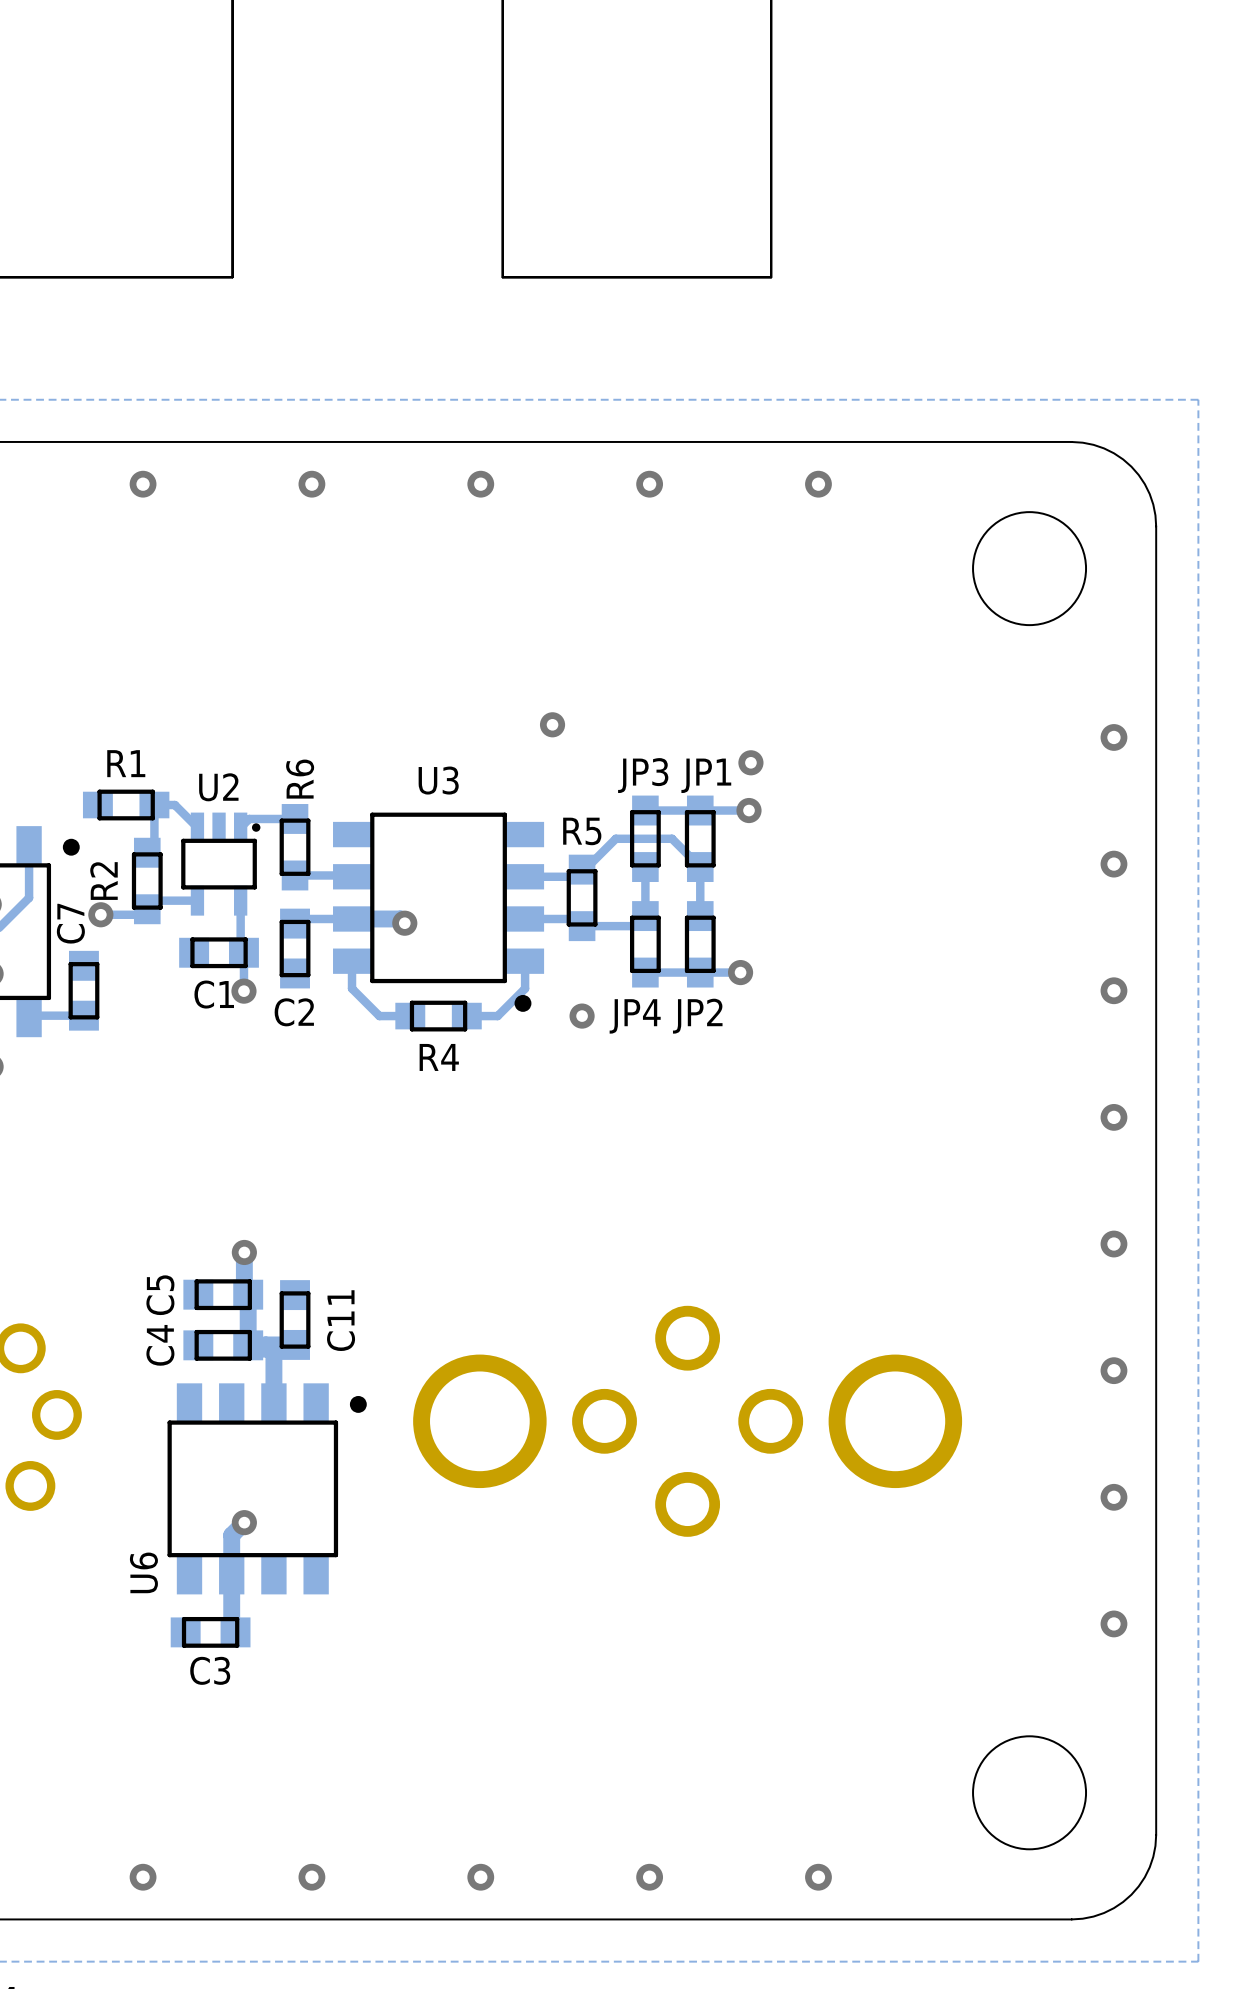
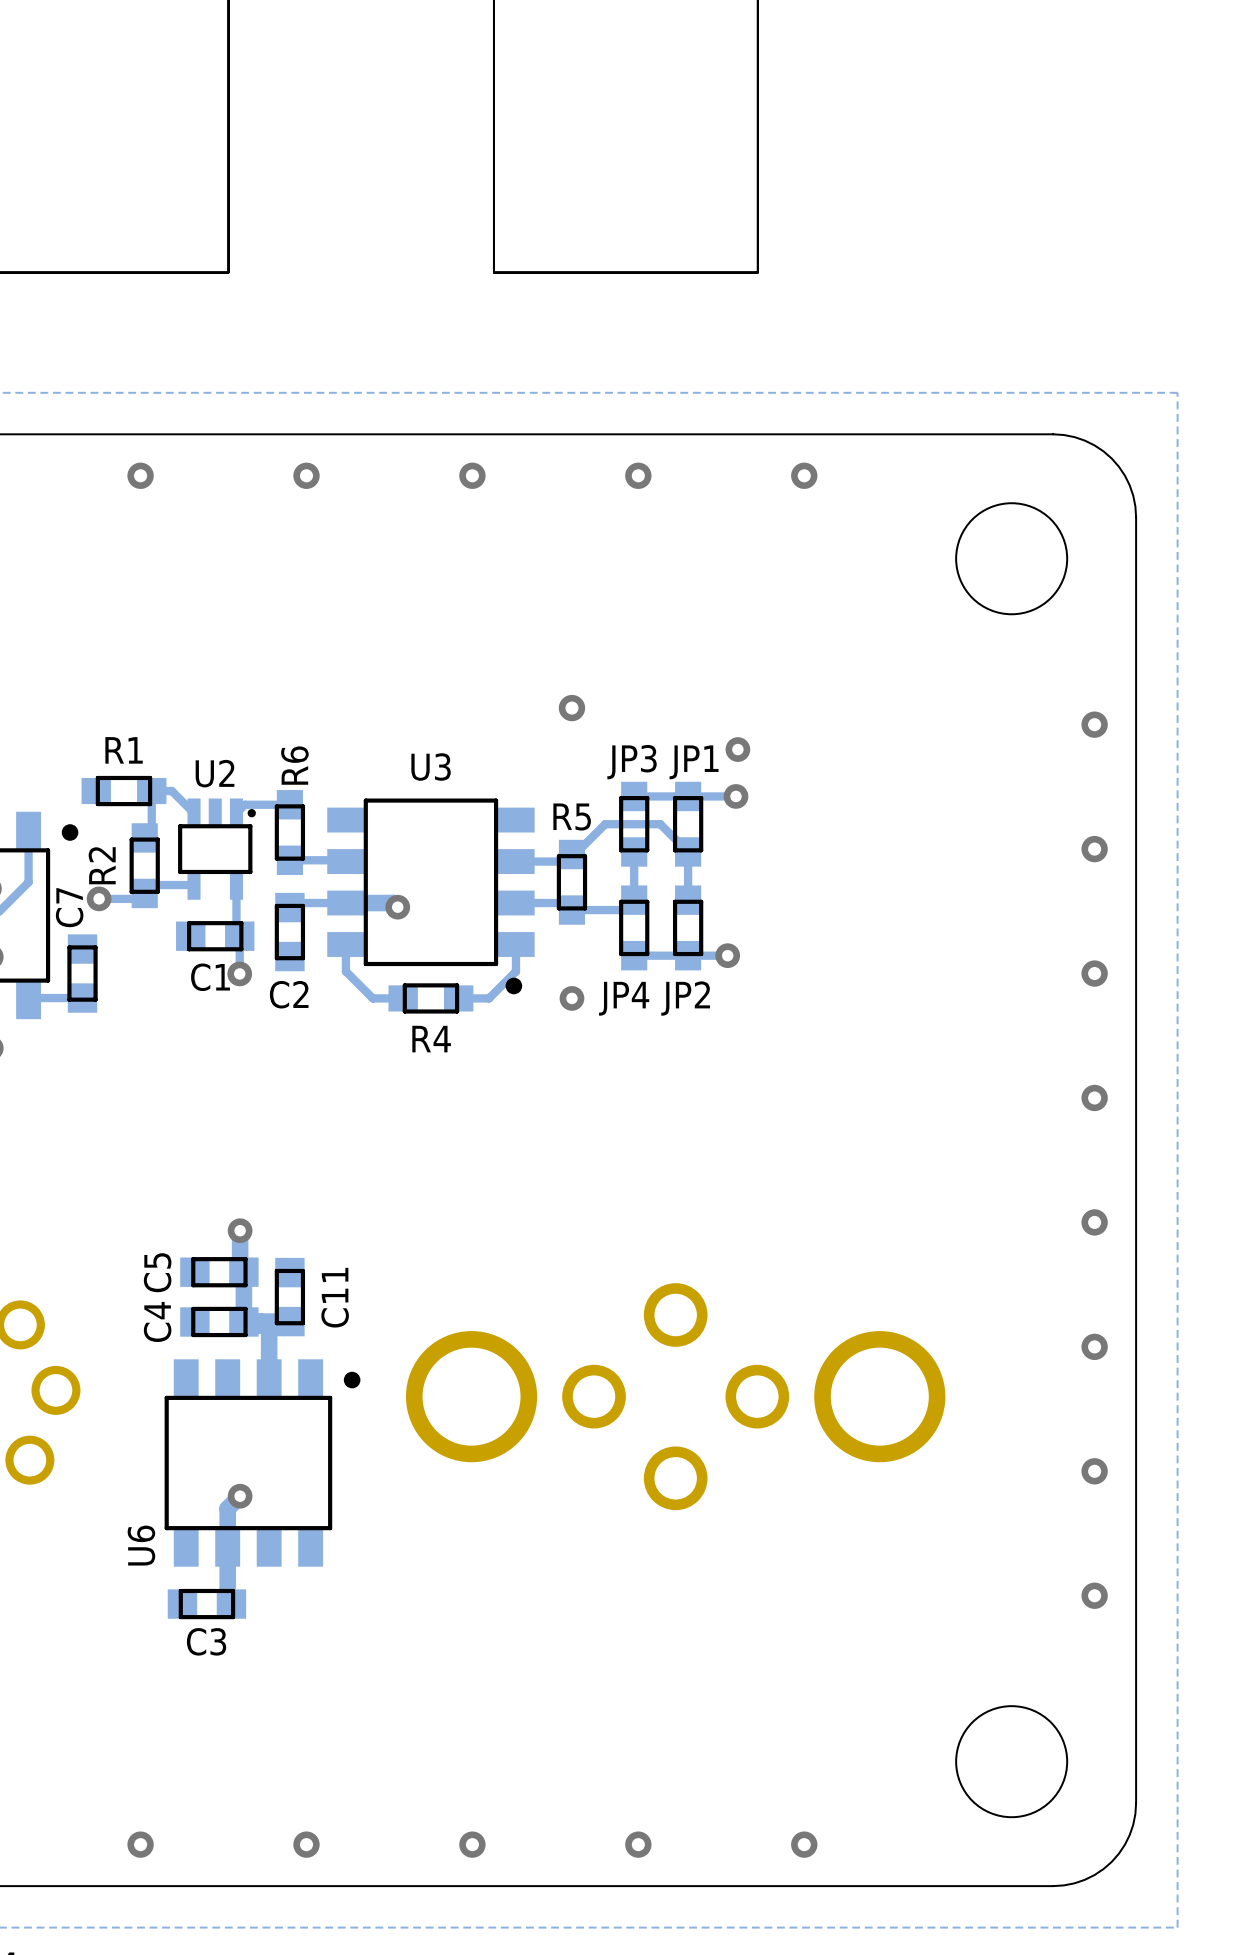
via: none -> (571, 708)
via: (552, 724) -> none

